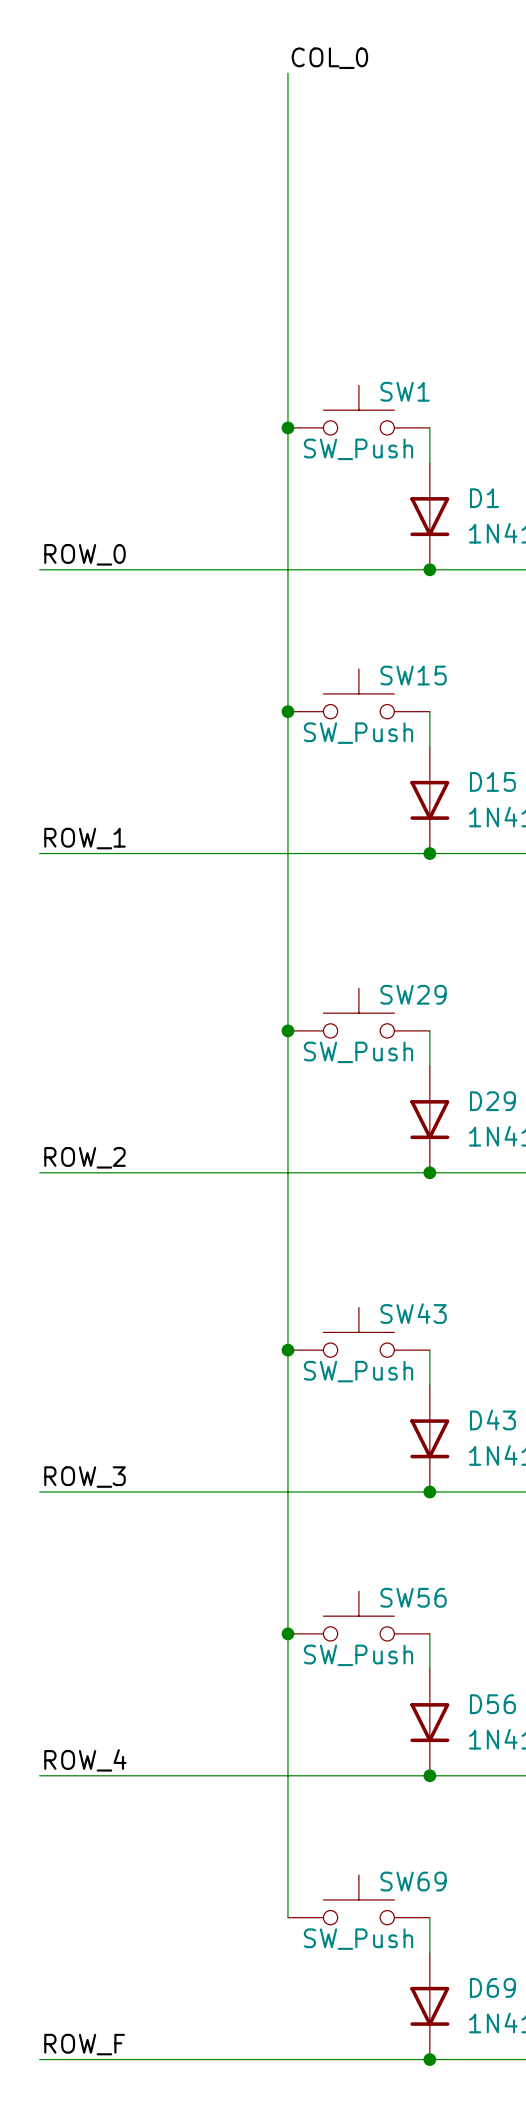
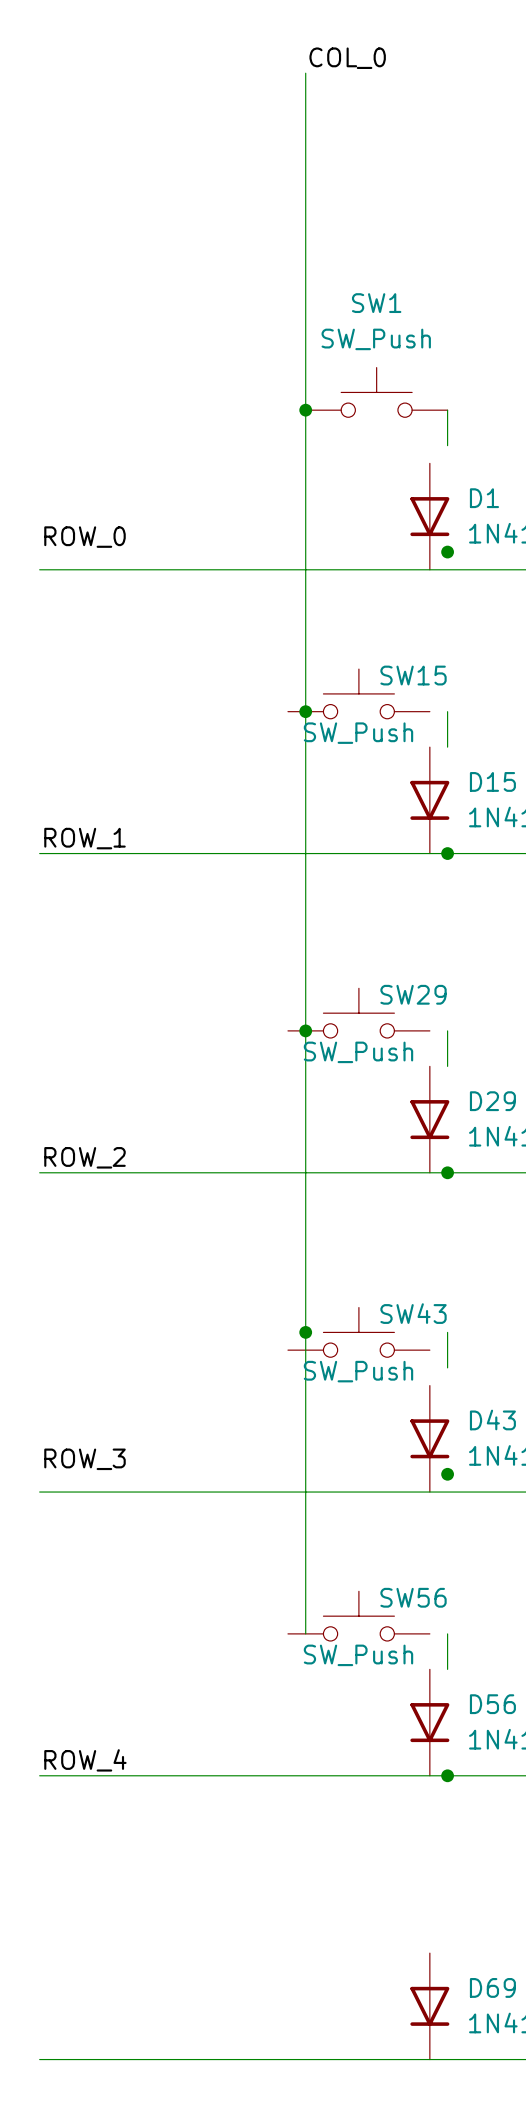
label position: COL_0 (329, 58) -> COL_0 (347, 58)
wire: (287, 73) (287, 1917) -> none
wire: none -> (305, 73) (305, 1633)
SW1 name position: SW1 (405, 391) -> SW1 (376, 303)
SW1 position: (358, 410) -> (376, 392)
junction position: (287, 427) -> (305, 410)
wire: (429, 427) (429, 463) -> (447, 410) (447, 445)
SW1 value position: SW_Push (358, 449) -> SW_Push (376, 339)
label position: ROW_0 (85, 554) -> ROW_0 (85, 537)
junction position: (429, 569) -> (447, 552)
junction position: (287, 711) -> (305, 711)
wire: (429, 711) (429, 747) -> (447, 711) (447, 747)
junction position: (429, 853) -> (447, 853)
junction position: (287, 1030) -> (305, 1030)
wire: (429, 1030) (429, 1066) -> (447, 1030) (447, 1066)
junction position: (429, 1172) -> (447, 1172)
junction position: (287, 1350) -> (305, 1332)
wire: (429, 1350) (429, 1385) -> (447, 1332) (447, 1367)
label position: ROW_3 (85, 1477) -> ROW_3 (85, 1459)
junction position: (429, 1492) -> (447, 1474)
junction: (287, 1633) -> none
wire: (429, 1633) (429, 1669) -> (447, 1633) (447, 1669)
junction position: (429, 1775) -> (447, 1775)
SW69: SW_Push (358, 1899) -> none
wire: (429, 1917) (429, 1953) -> none
label: ROW_F (84, 2044) -> none
junction: (429, 2059) -> none

